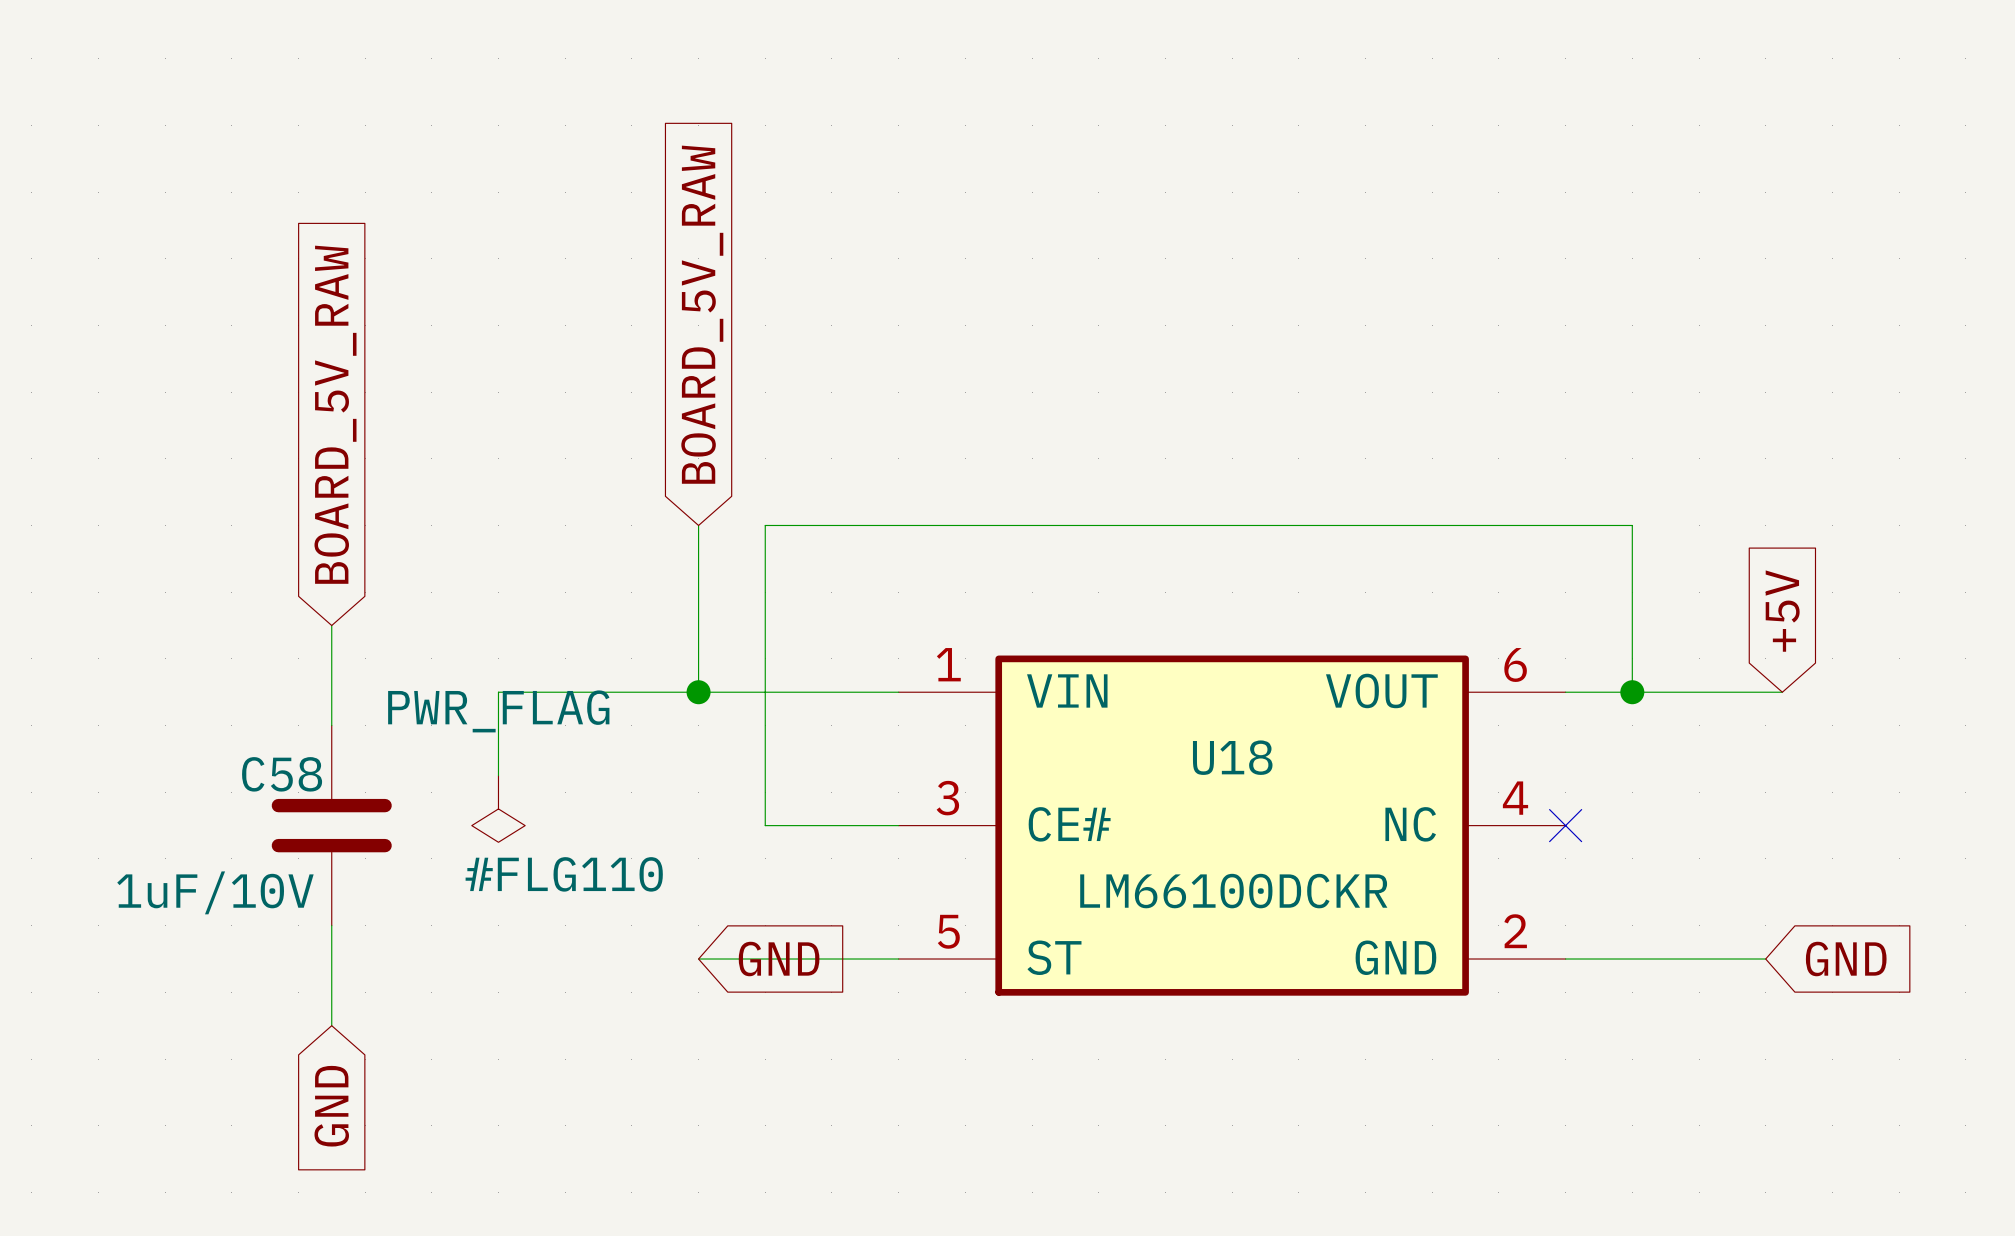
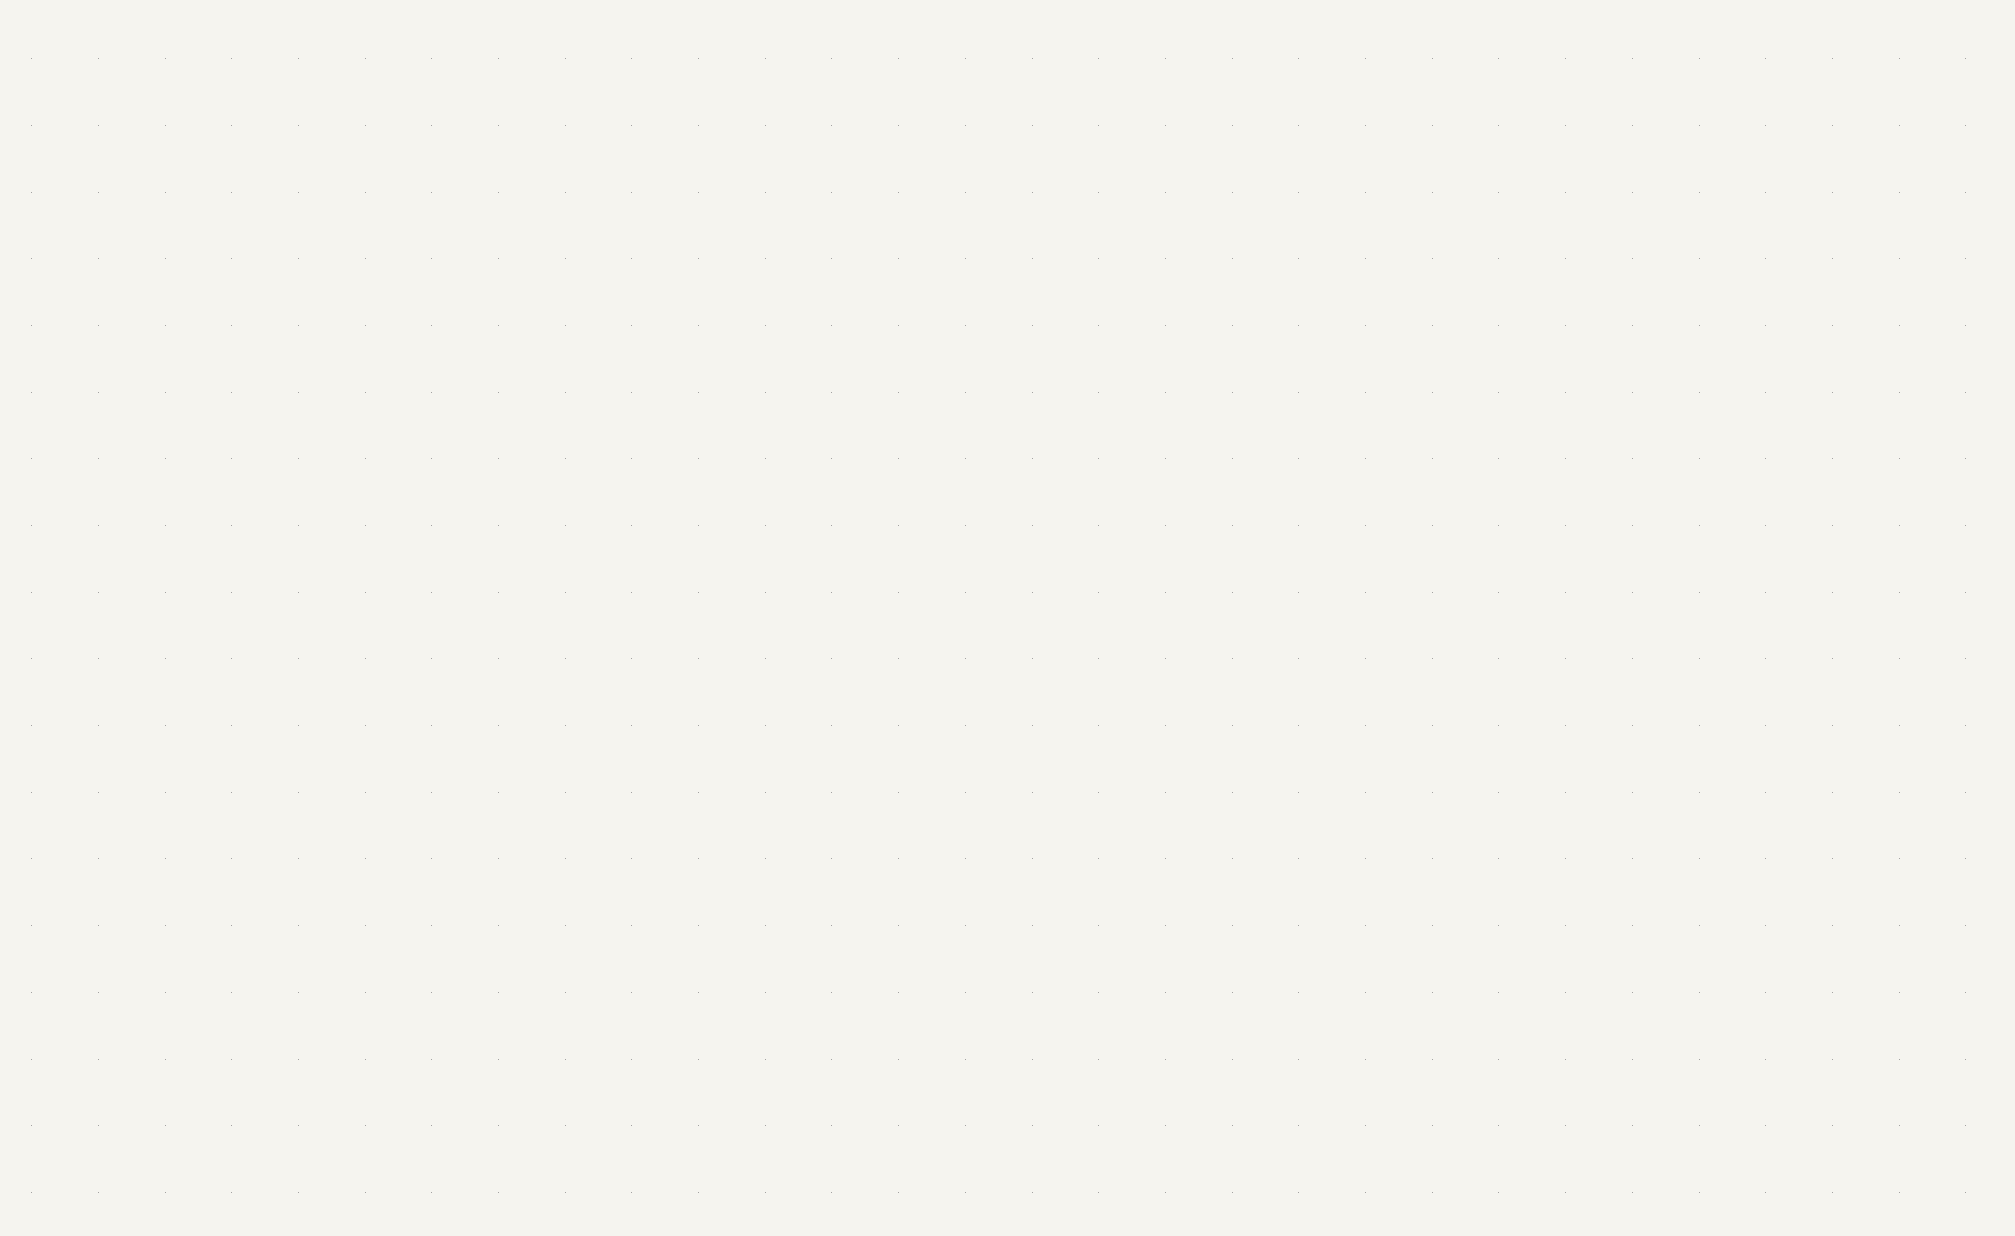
global label: BOARD_5V_RAW (702, 314) -> none
global label: BOARD_5V_RAW (335, 414) -> none
wire: (698, 525) (698, 692) -> none
global label: +5V (1782, 611) -> none
wire: (331, 625) (331, 725) -> none
junction: (698, 692) -> none
wire: (898, 692) (498, 692) (498, 775) -> none
wire: (1565, 692) (1782, 692) -> none
wire: (1632, 692) (1632, 525) (765, 525) (765, 825) (898, 825) -> none
junction: (1632, 692) -> none
#FLG110: PWR_FLAG (498, 808) -> none
C58: 1uF/10V (331, 825) -> none
U18: LM66100DCKR (1232, 825) -> none
no-connect mark: (1565, 825) -> none
wire: (331, 925) (331, 1025) -> none
wire: (698, 959) (898, 959) -> none
global label: GND (779, 959) -> none
wire: (1565, 959) (1765, 959) -> none
global label: GND (1846, 959) -> none
global label: GND (331, 1106) -> none

